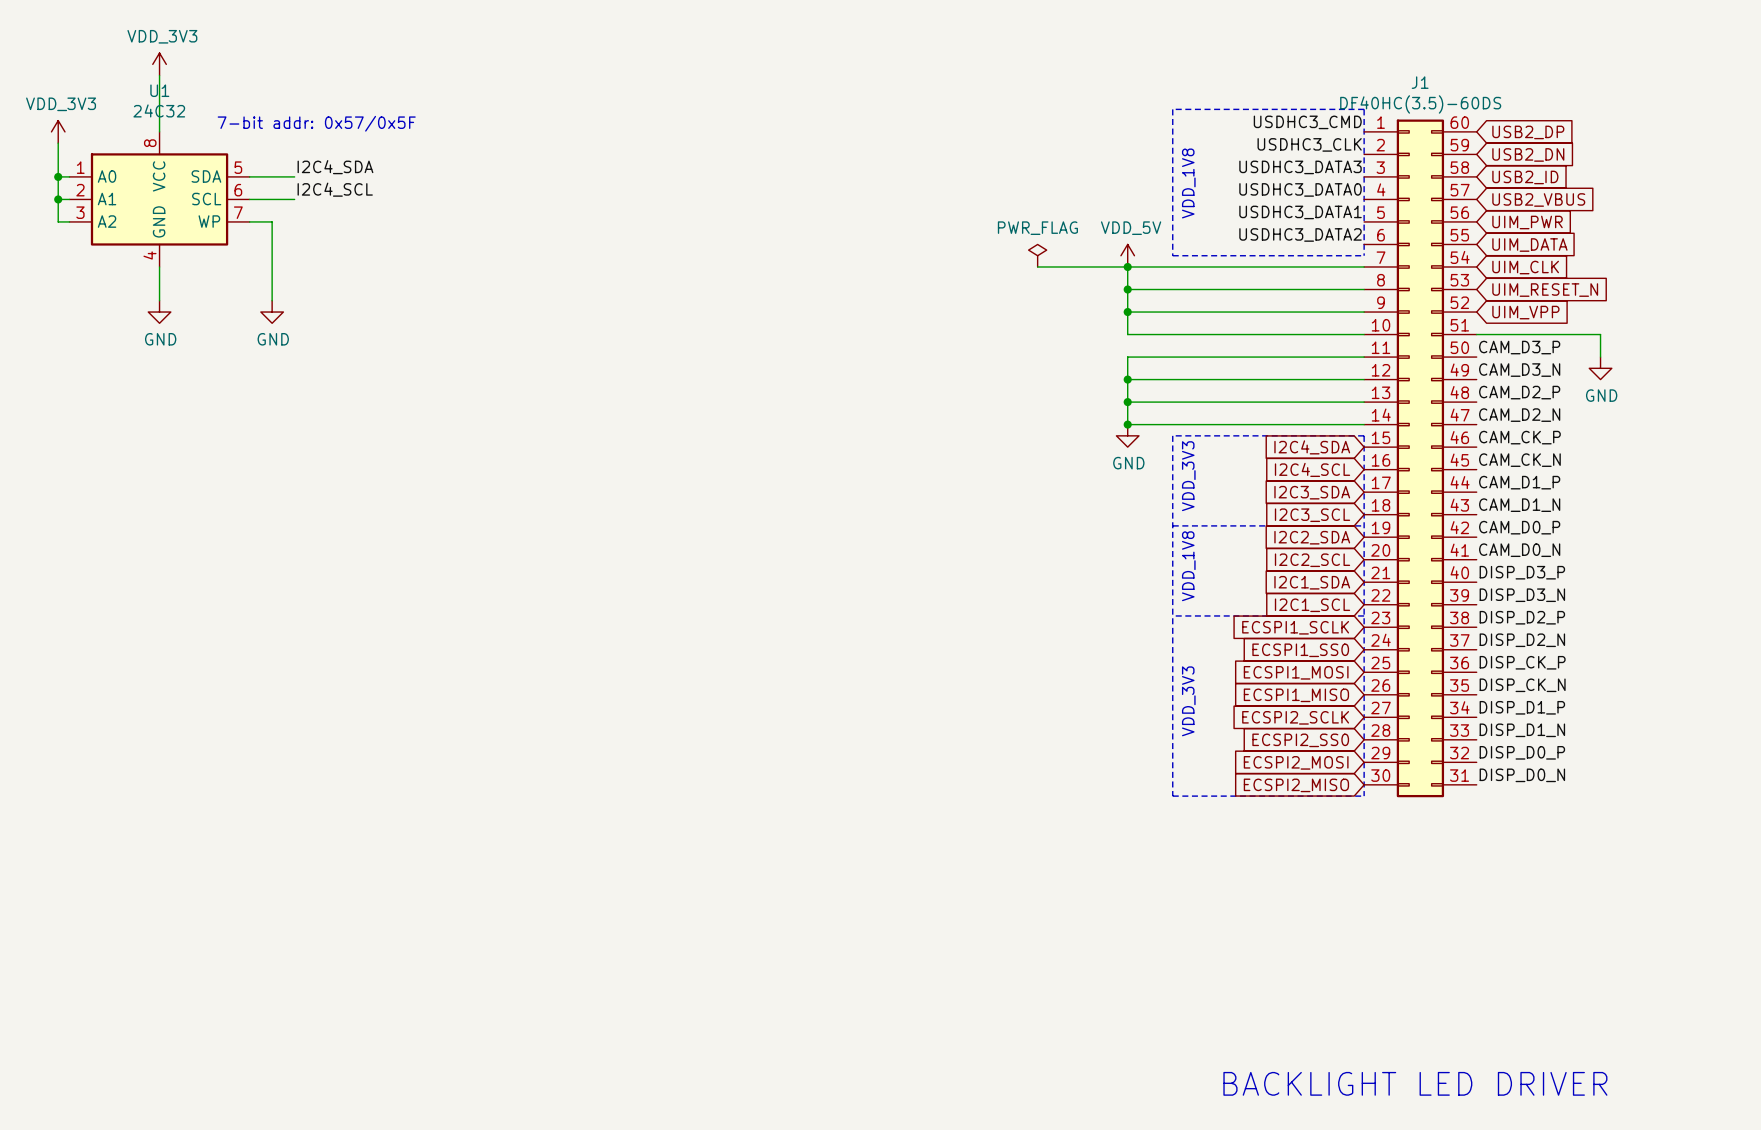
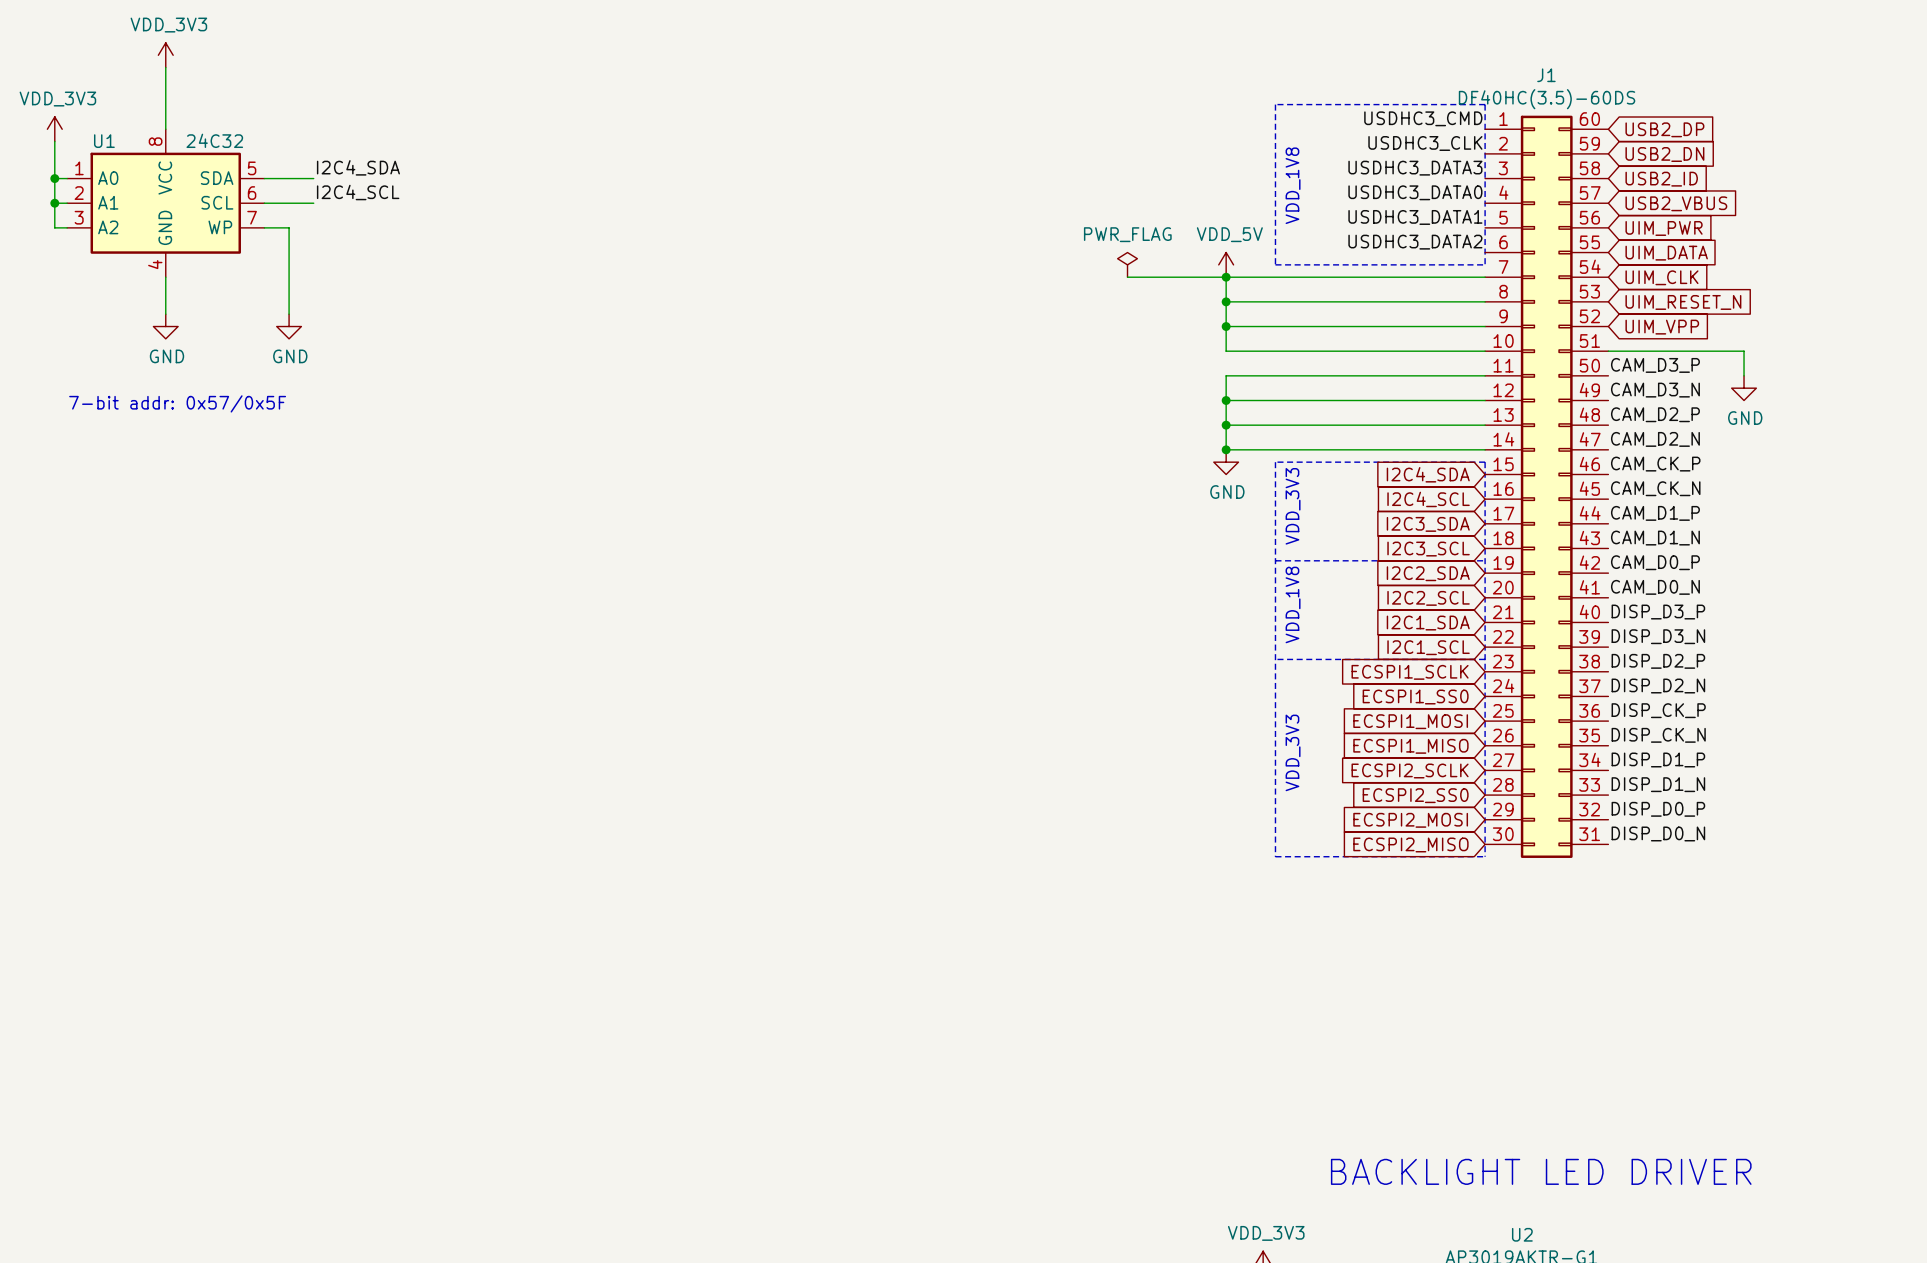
U1 name position: U1 (159, 90) -> U1 (104, 141)
U1 value position: 24C32 (159, 110) -> 24C32 (214, 140)
text: 7-bit addr: 0x57/0x5F (316, 123) -> none
text: none -> 7-bit addr: 0x57/0x5F (177, 403)

